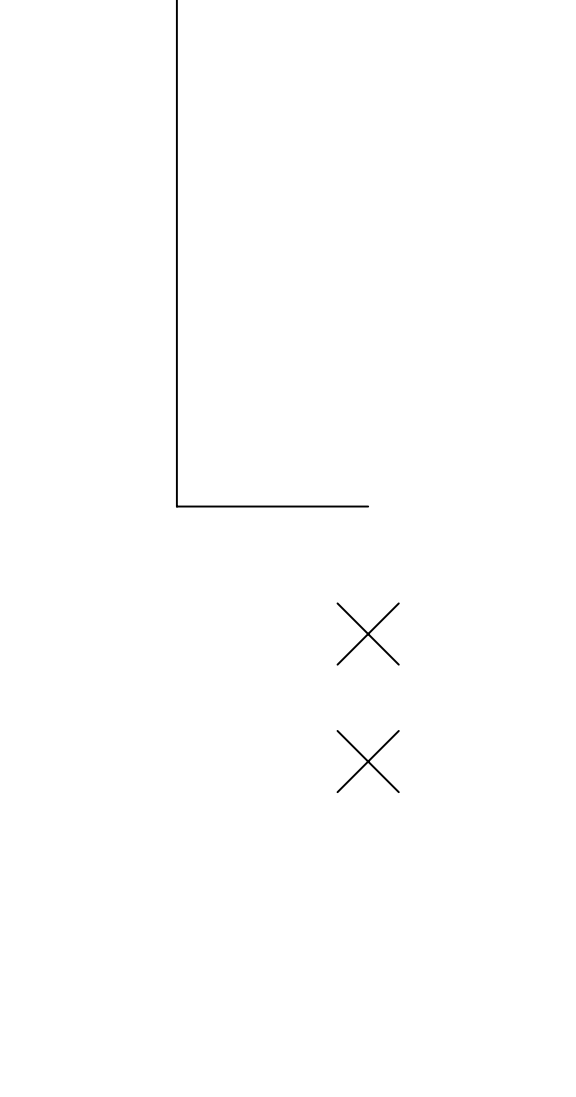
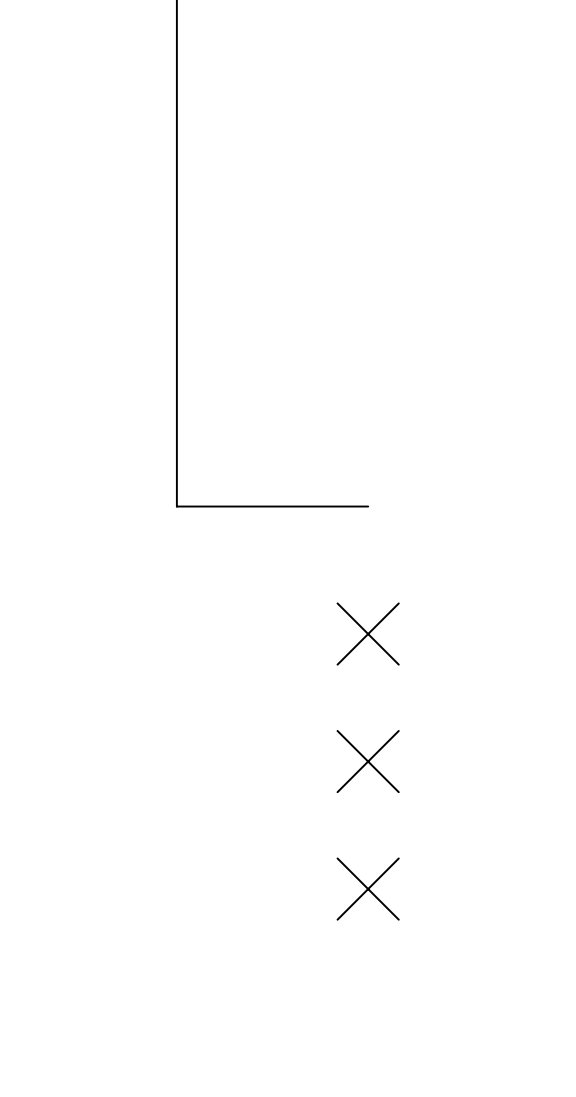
no-connect mark: none -> (368, 889)

